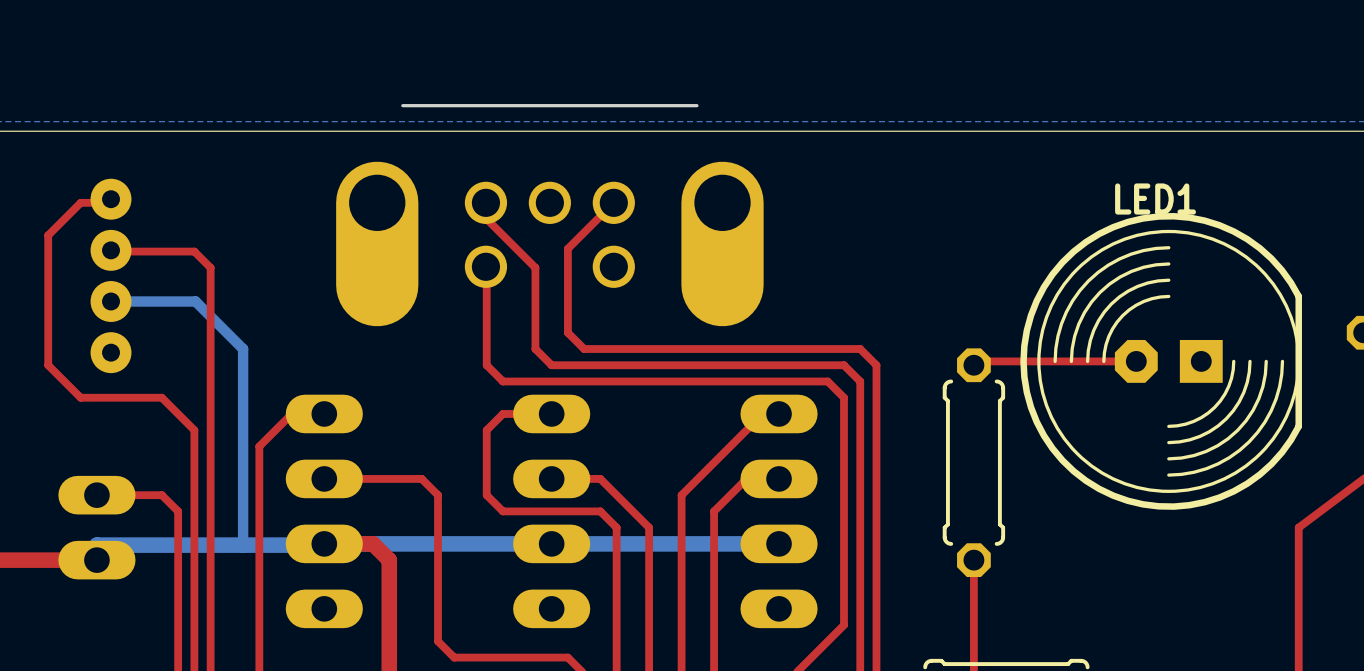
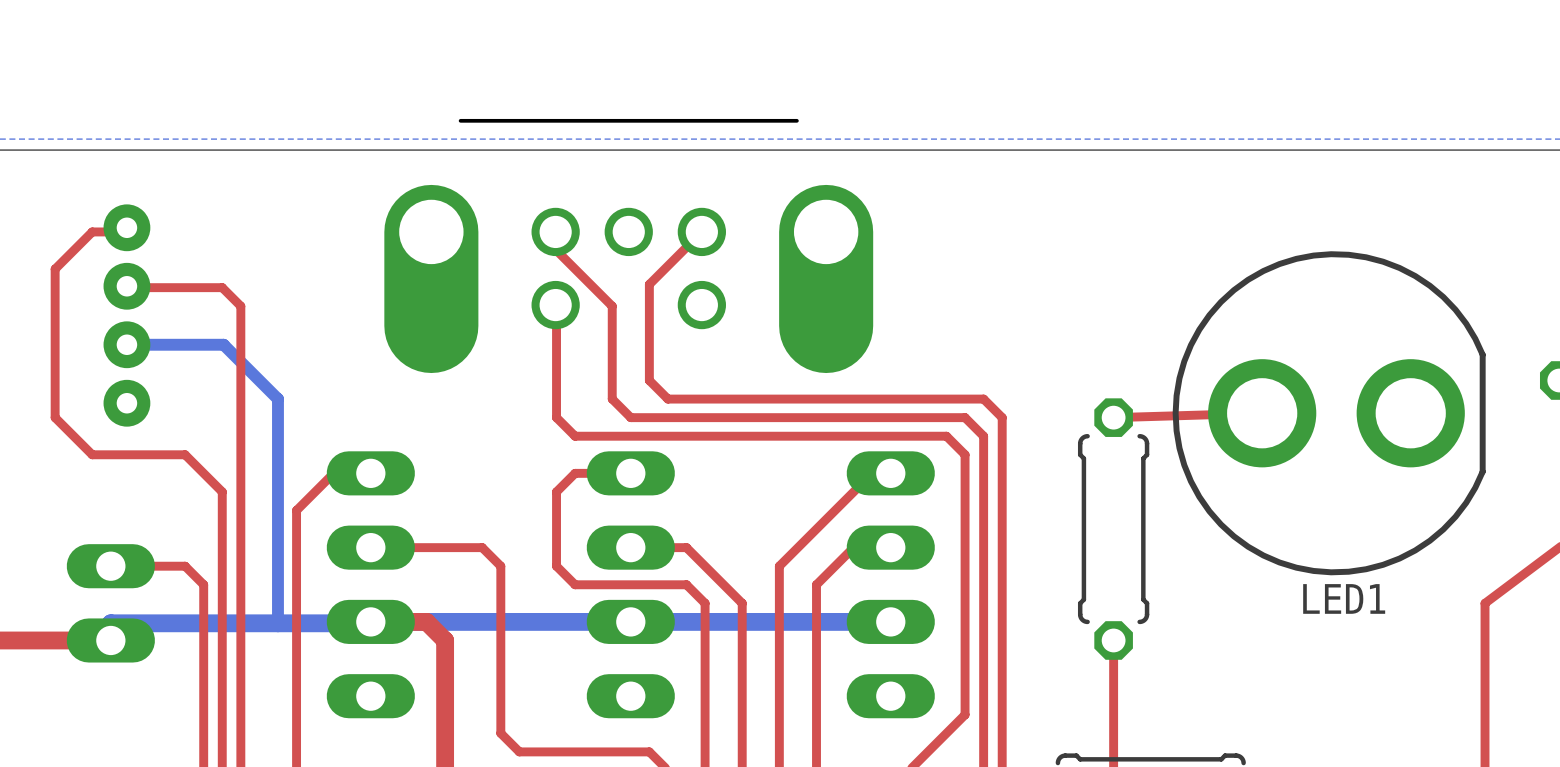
LED1 name position: LED1 (1155, 199) -> LED1 (1344, 598)
LED1 footprint: [1020, 213, 1302, 510] -> [1172, 251, 1486, 576]
top track: (1136, 361) (977, 361) (973, 365) -> (1262, 413) (1113, 417)

